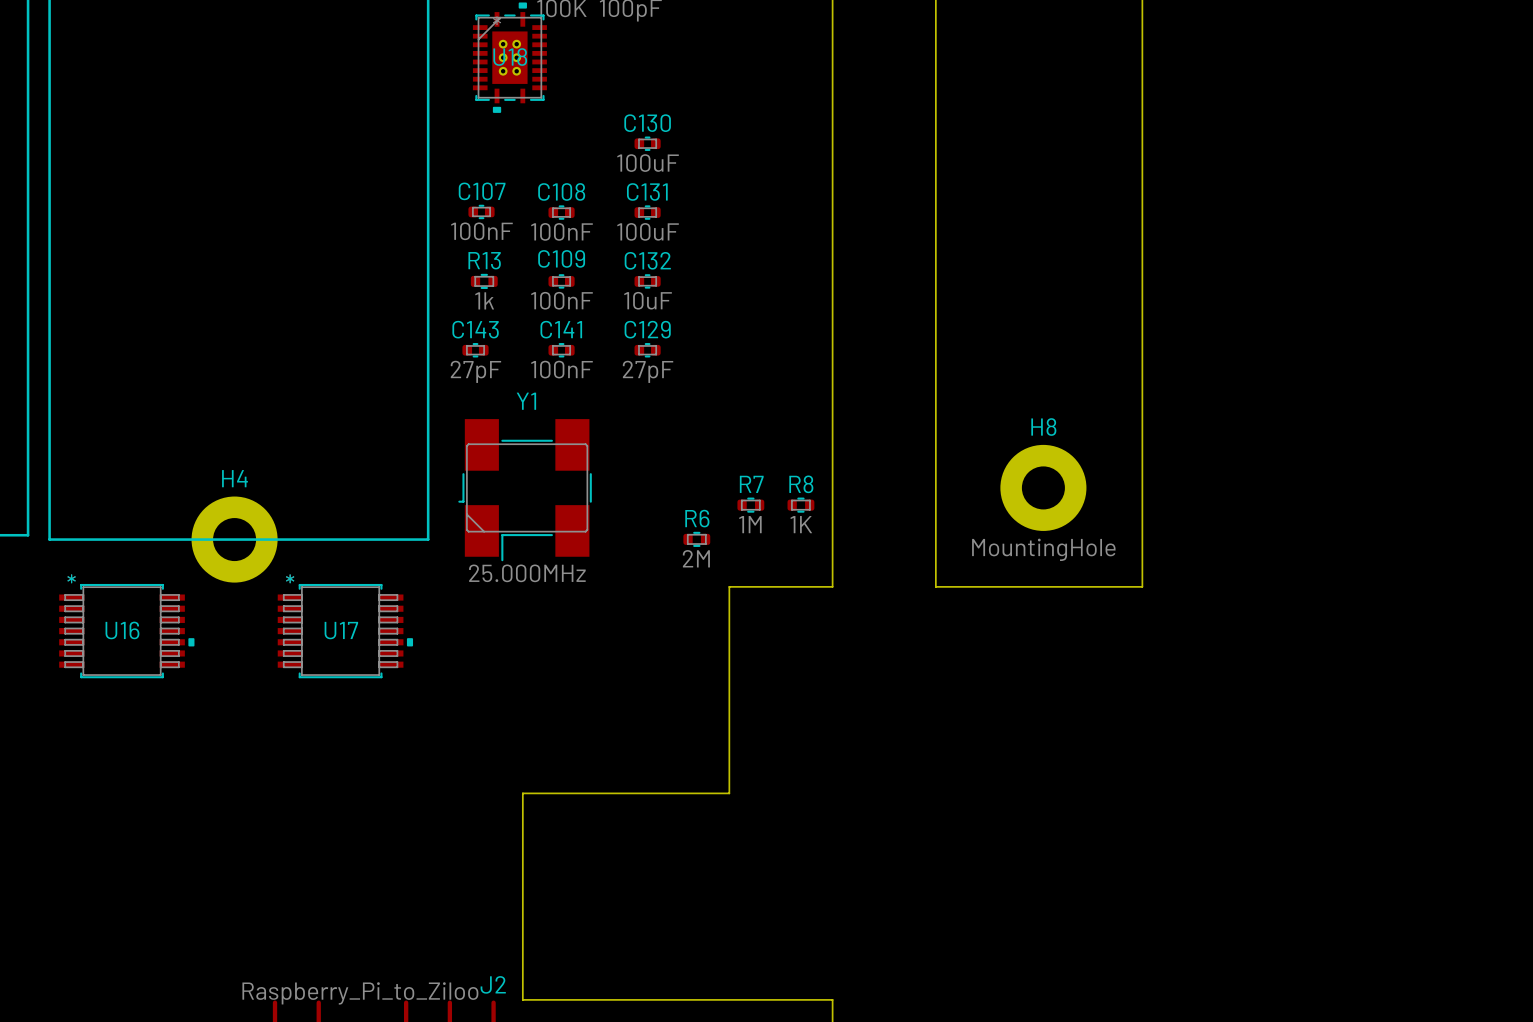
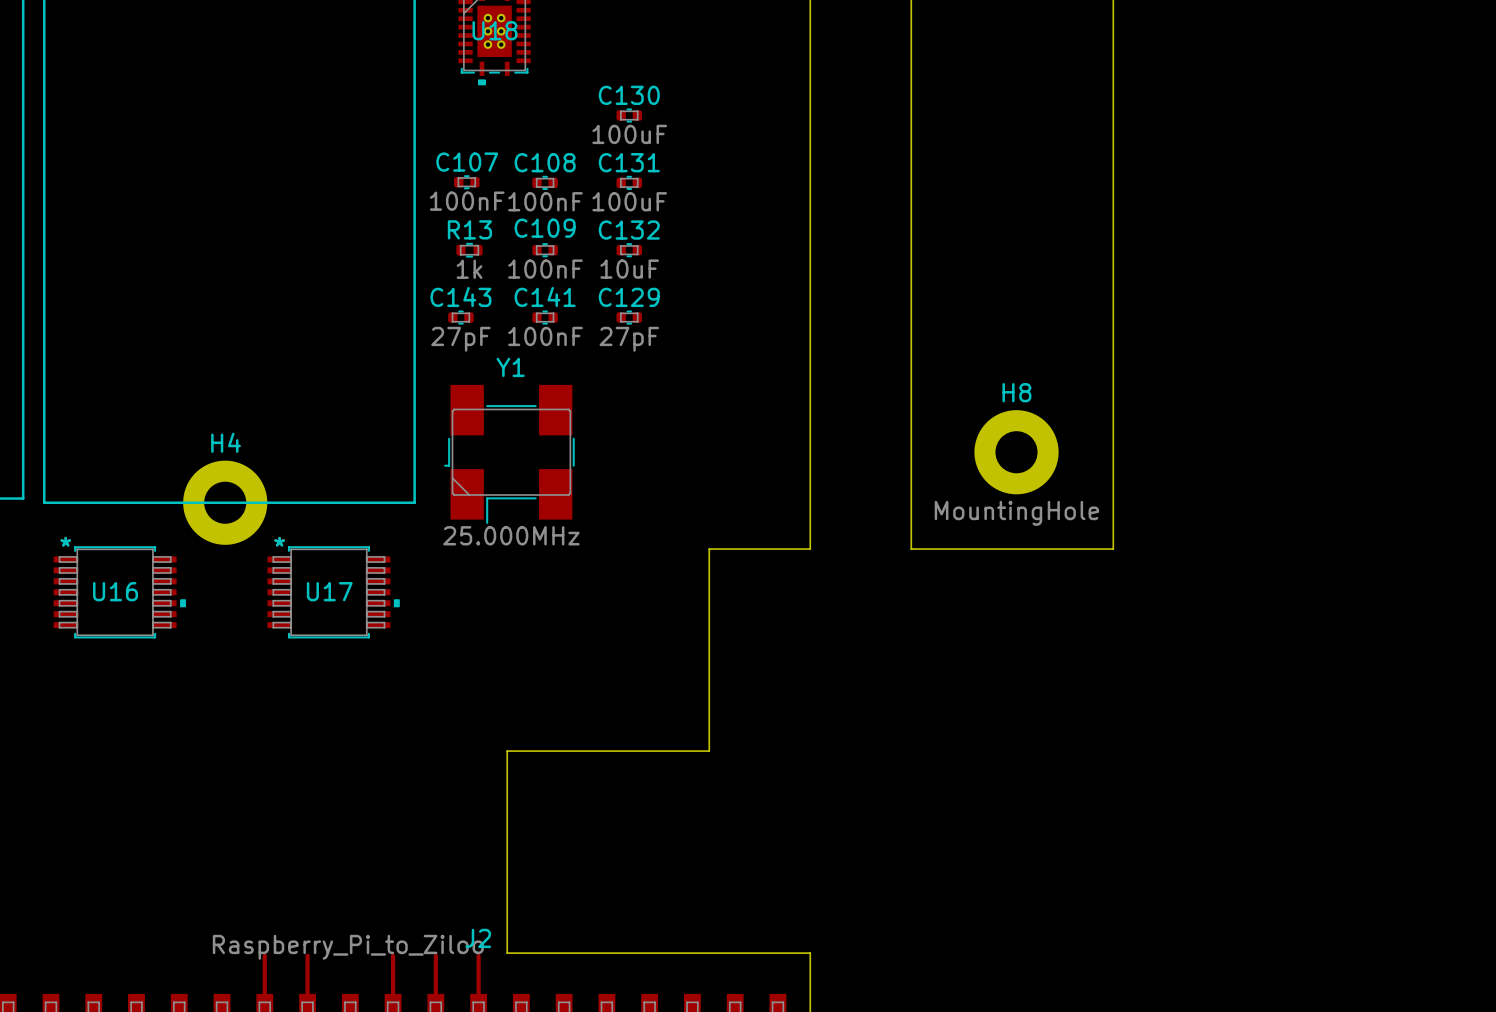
R7: 1M (750, 505) -> none
R8: 1K (800, 505) -> none
R6: 2M (696, 539) -> none

